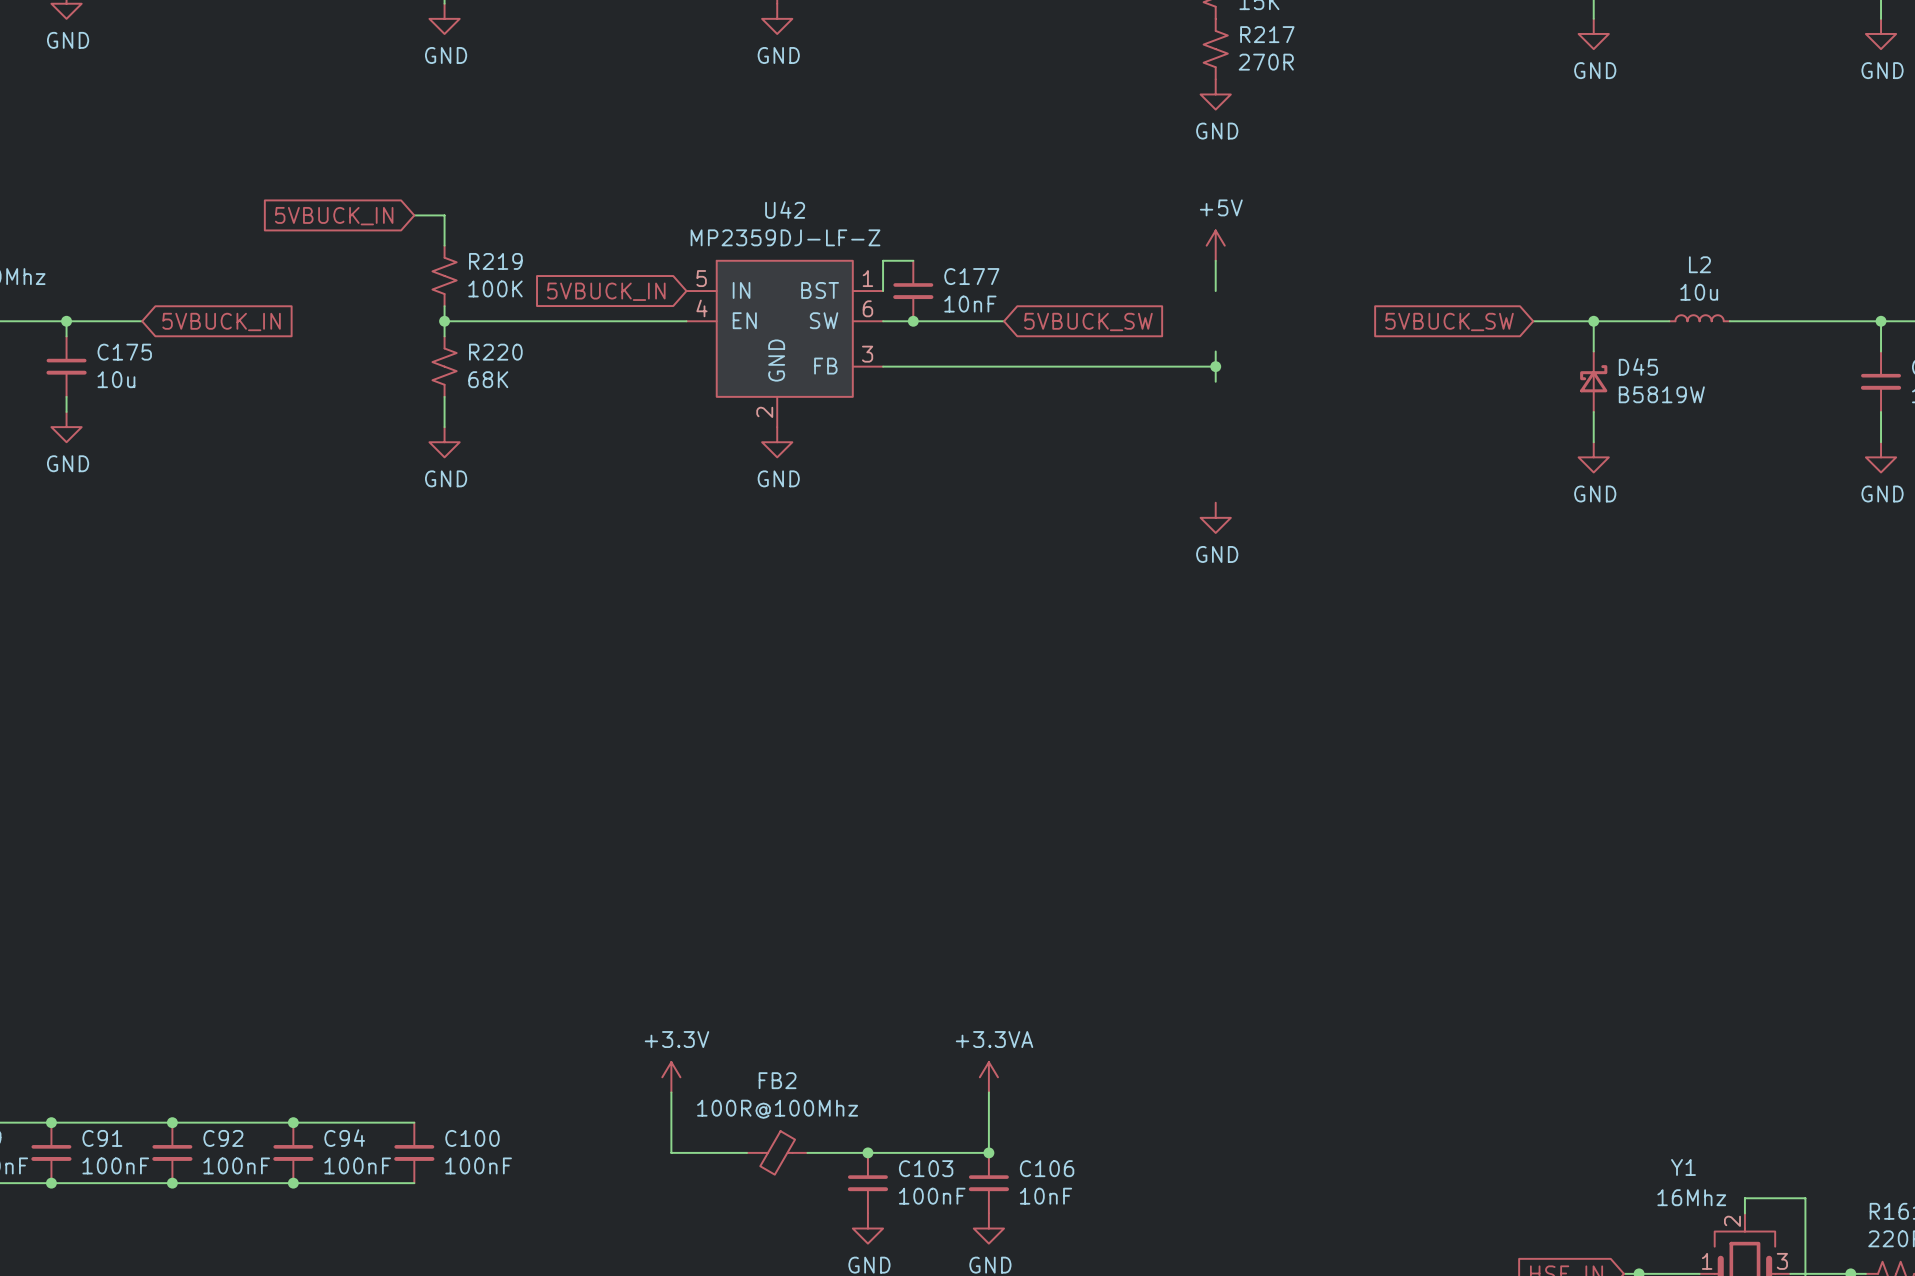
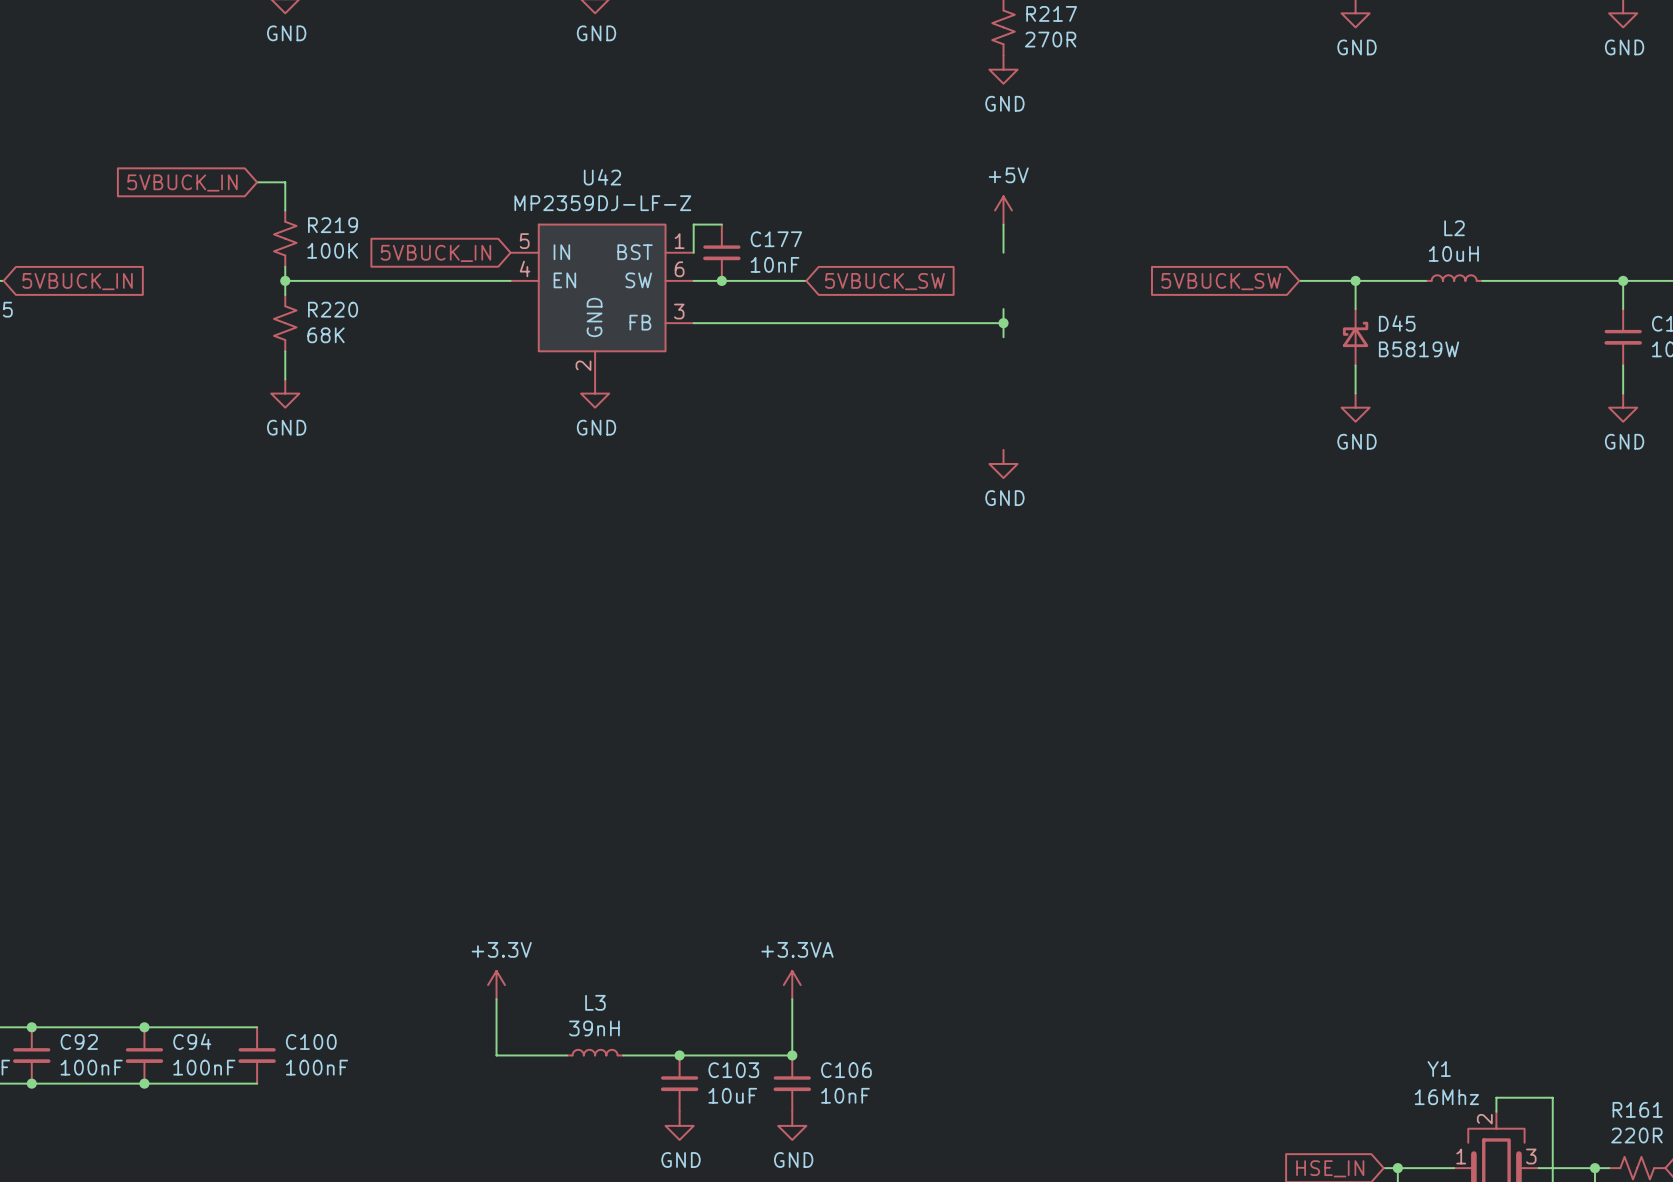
L2 value: 10u (1699, 292) -> 10uH (1453, 253)
L3: none -> 39nH (595, 1052)
FB2: 100R@100Mhz (777, 1152) -> none
C103 value: 100nF (932, 1196) -> 10uF (732, 1095)

